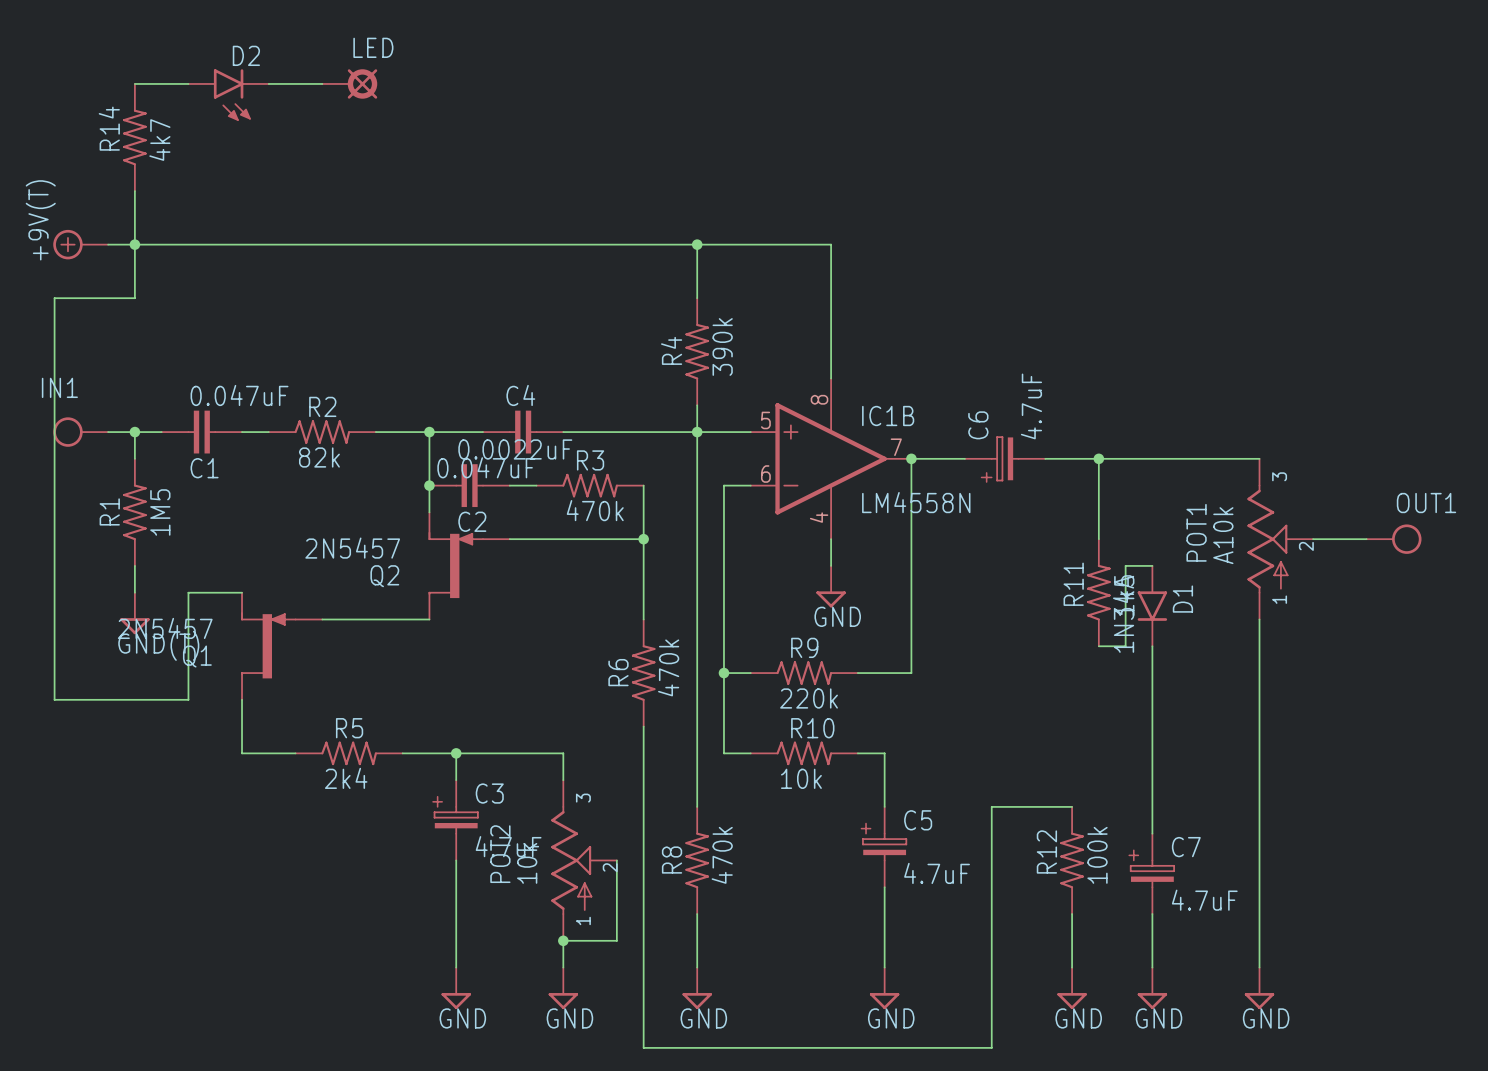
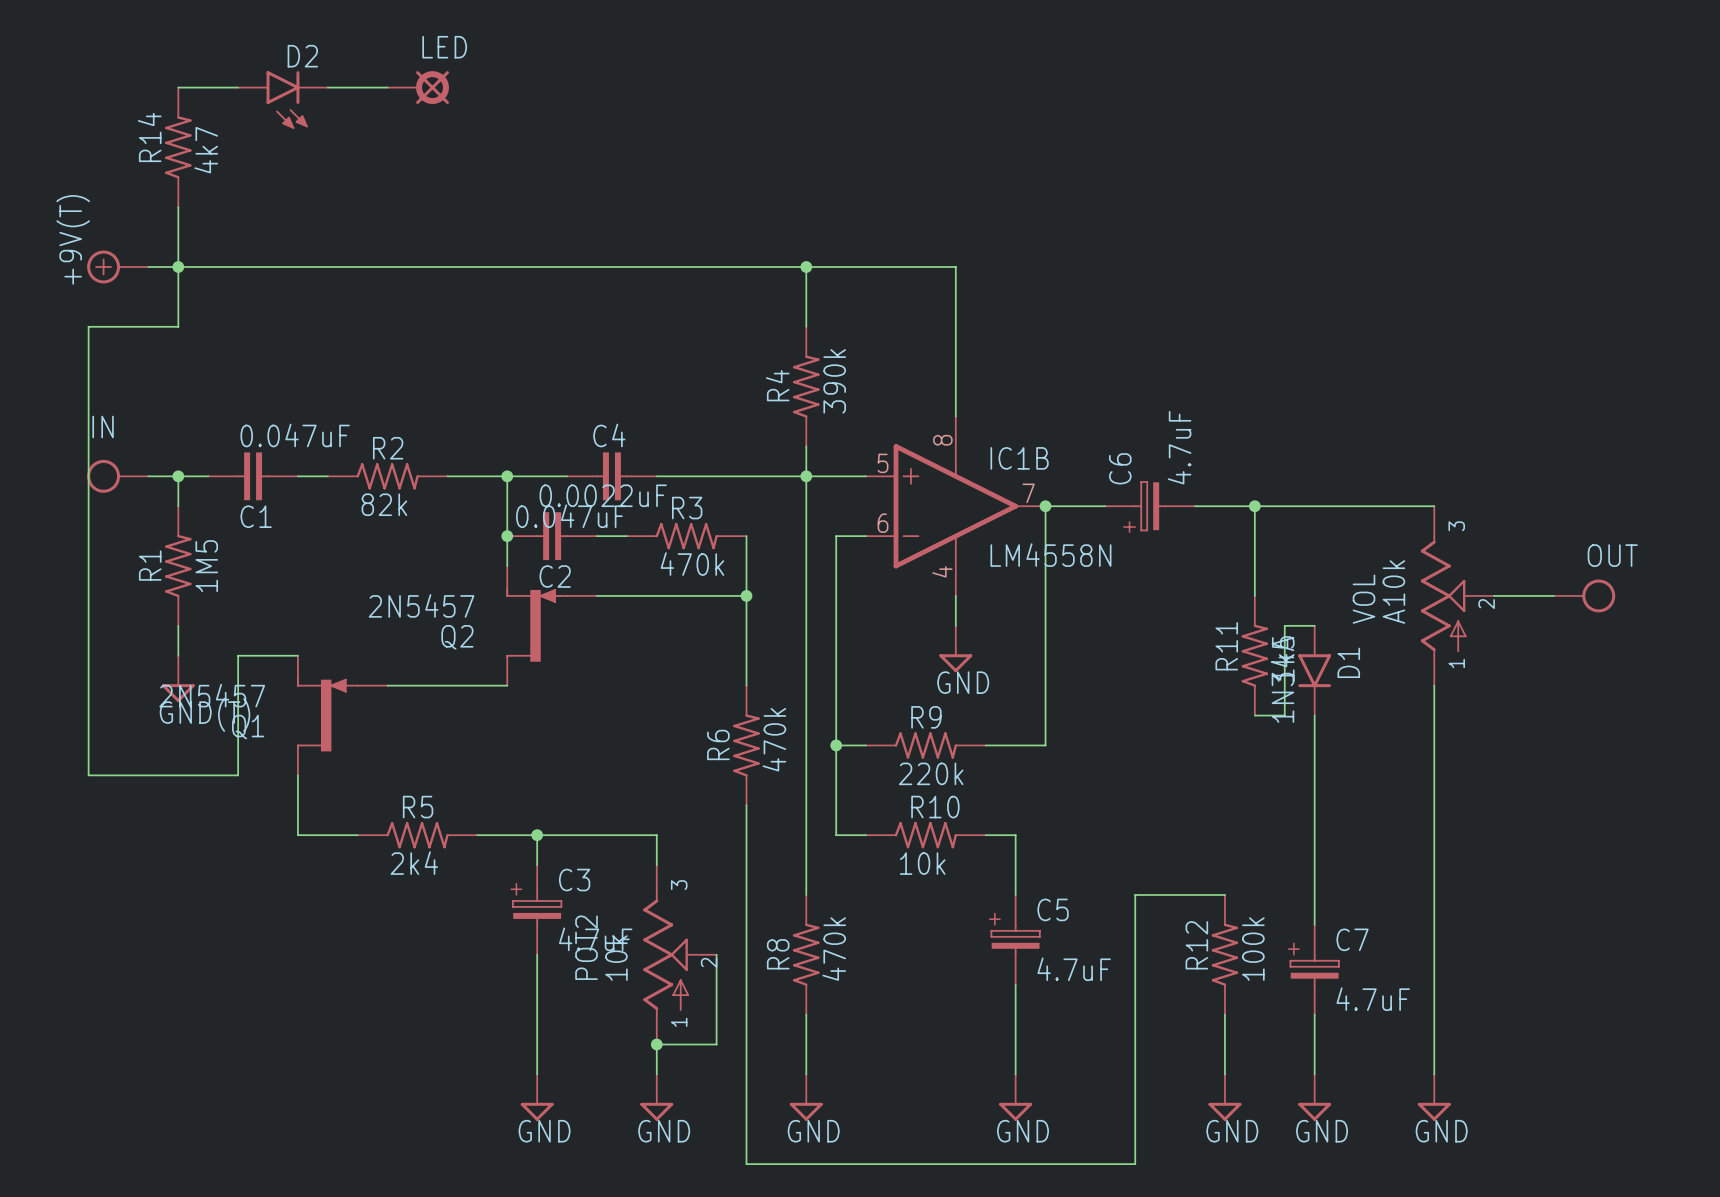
IN1 name: IN1 (59, 387) -> IN (103, 426)
OUT1 name: OUT1 (1426, 503) -> OUT (1612, 555)
POT1 name: POT1 (1196, 532) -> VOL (1364, 599)

